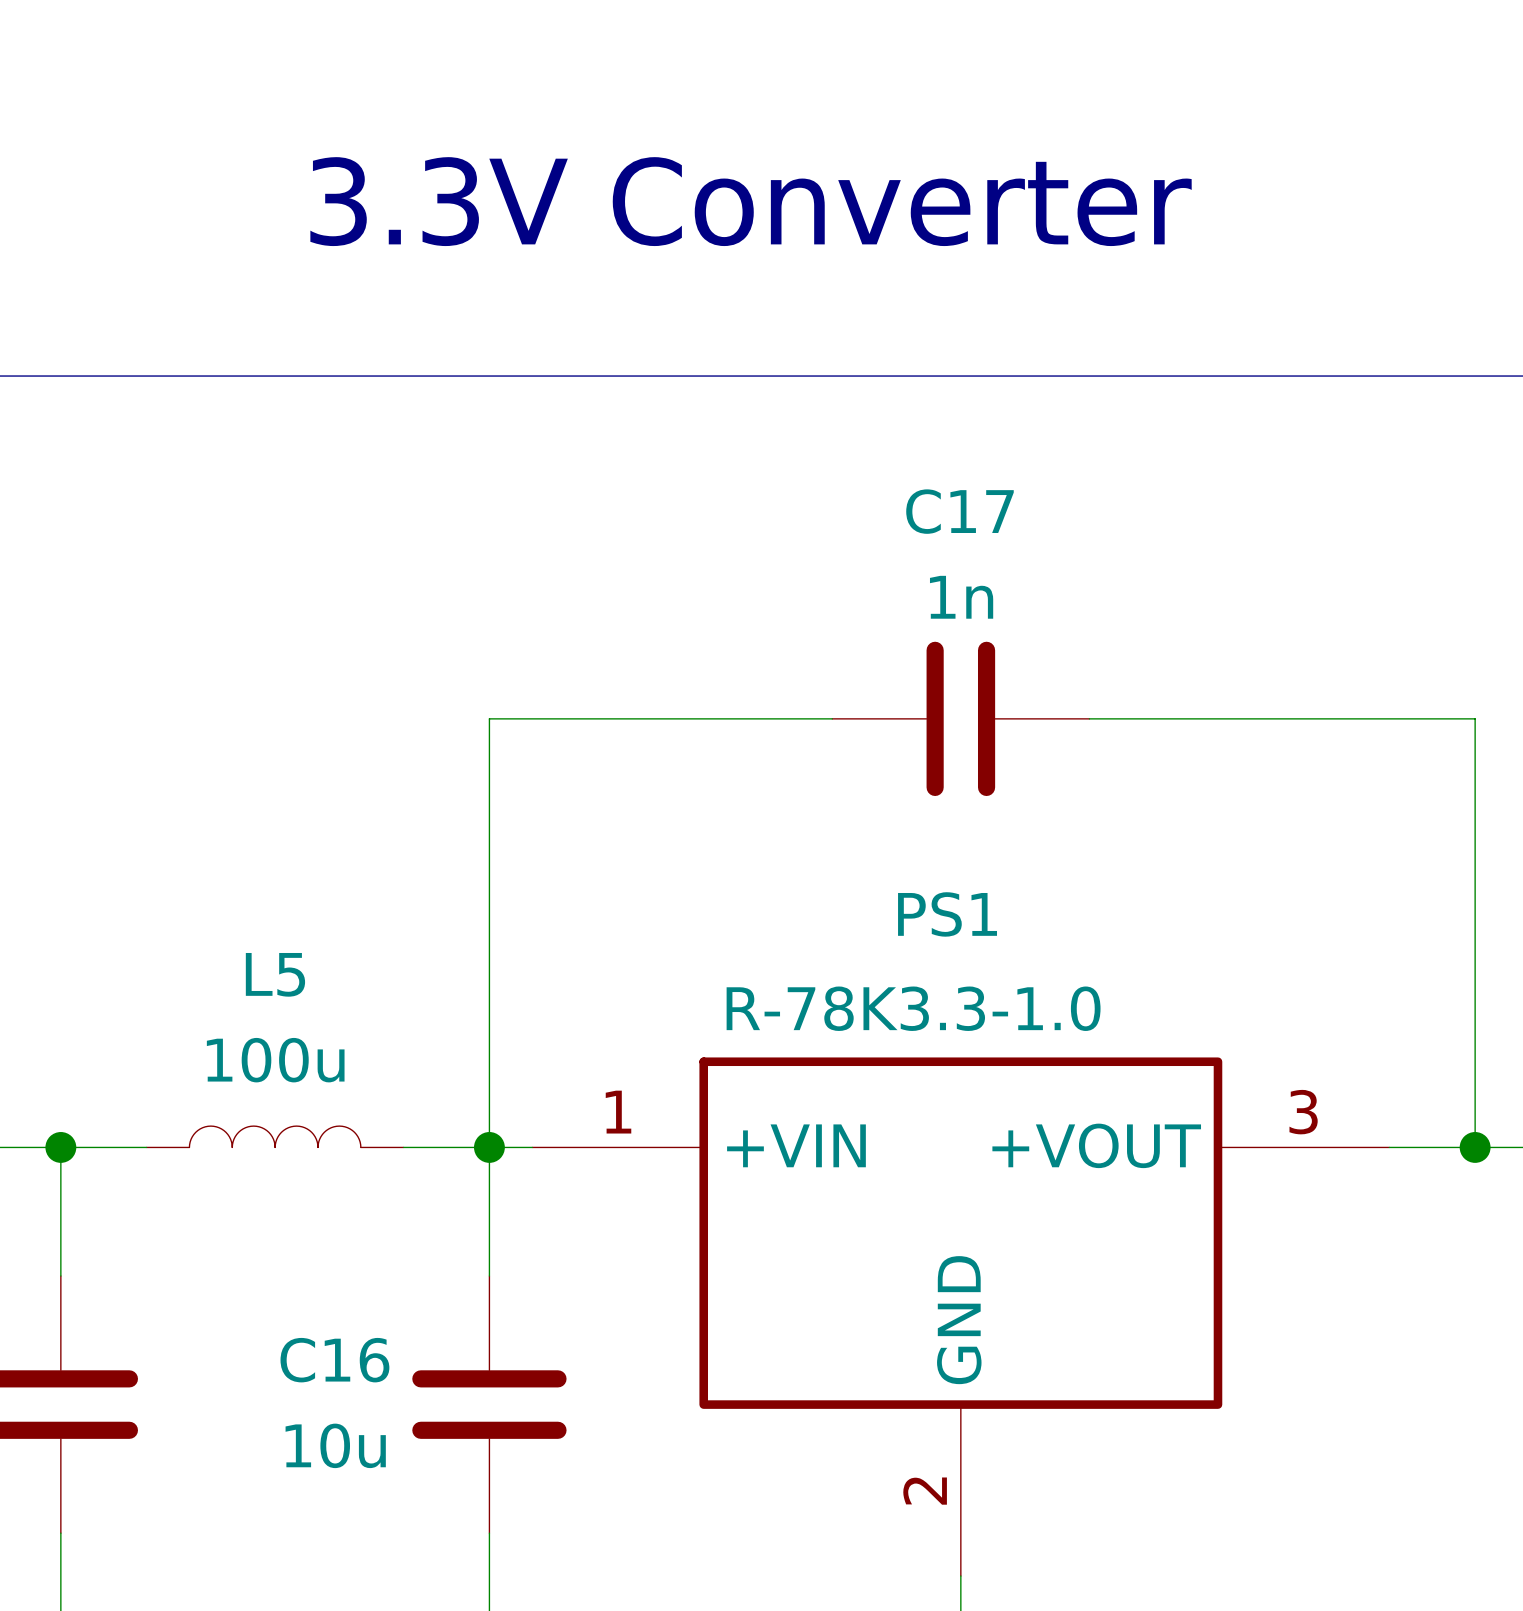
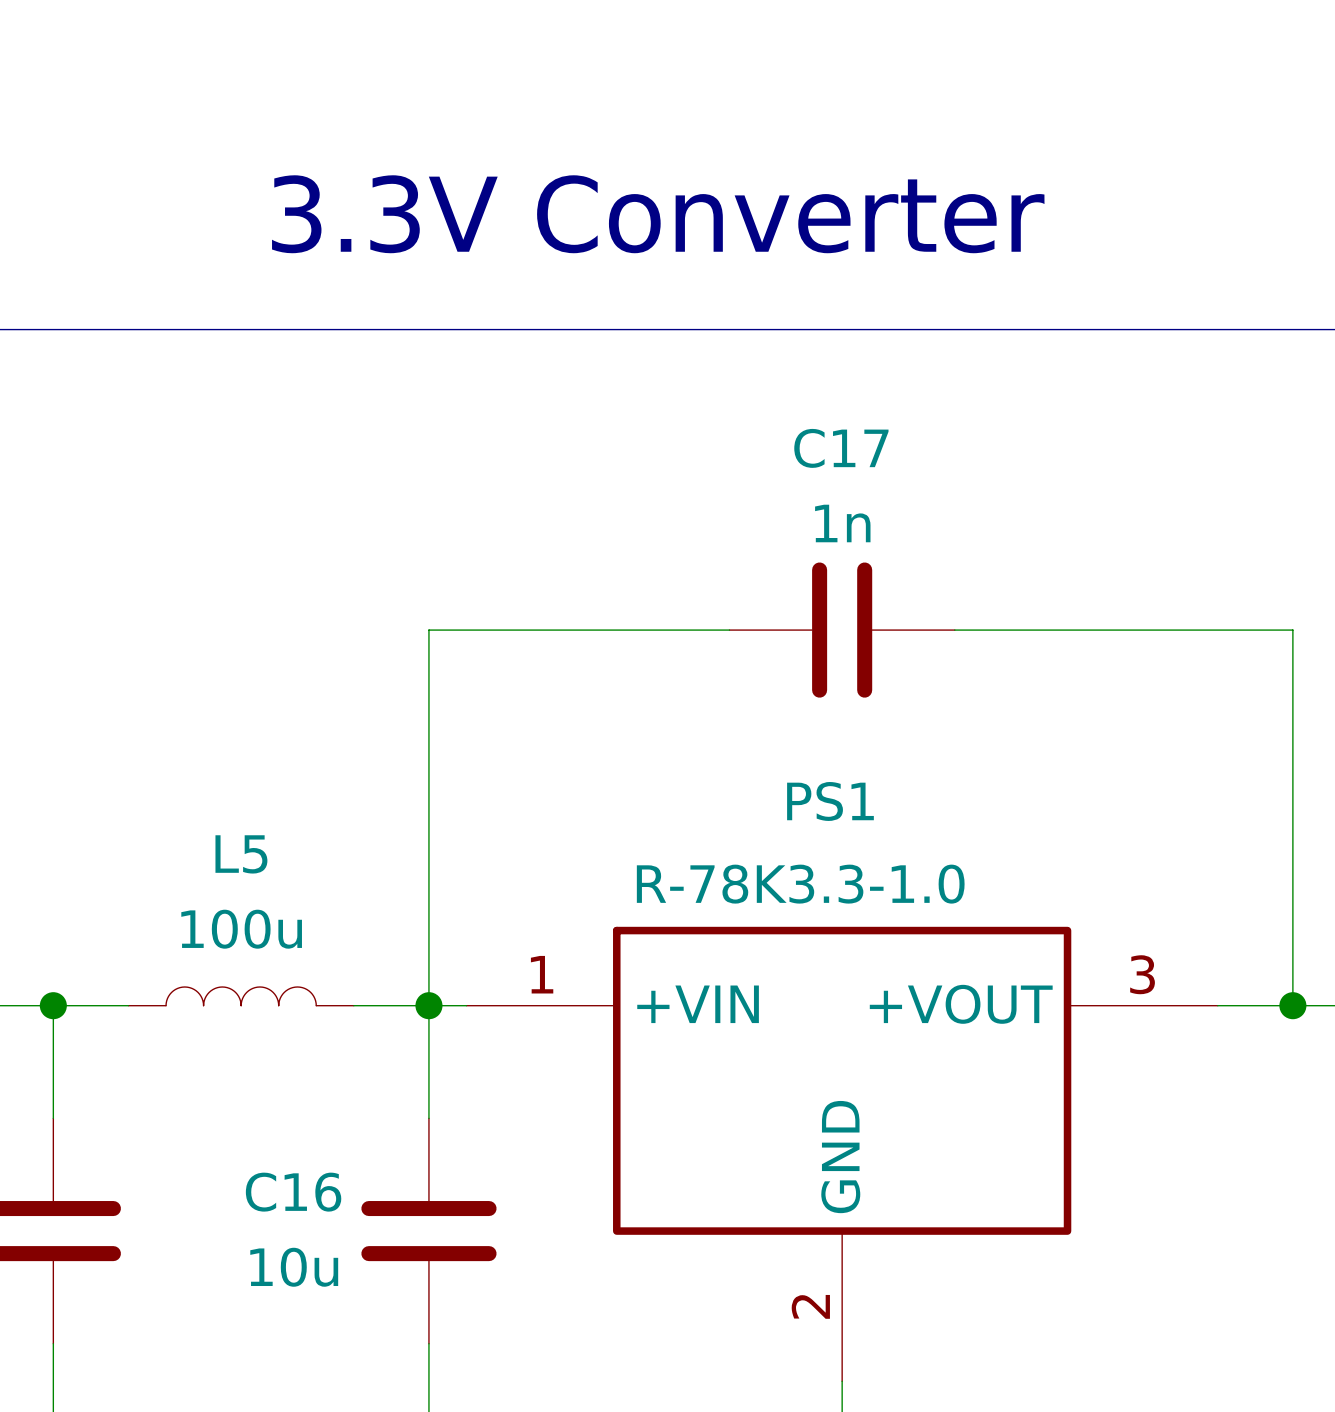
text position: 3.3V Converter (751, 201) -> 3.3V Converter (658, 214)

